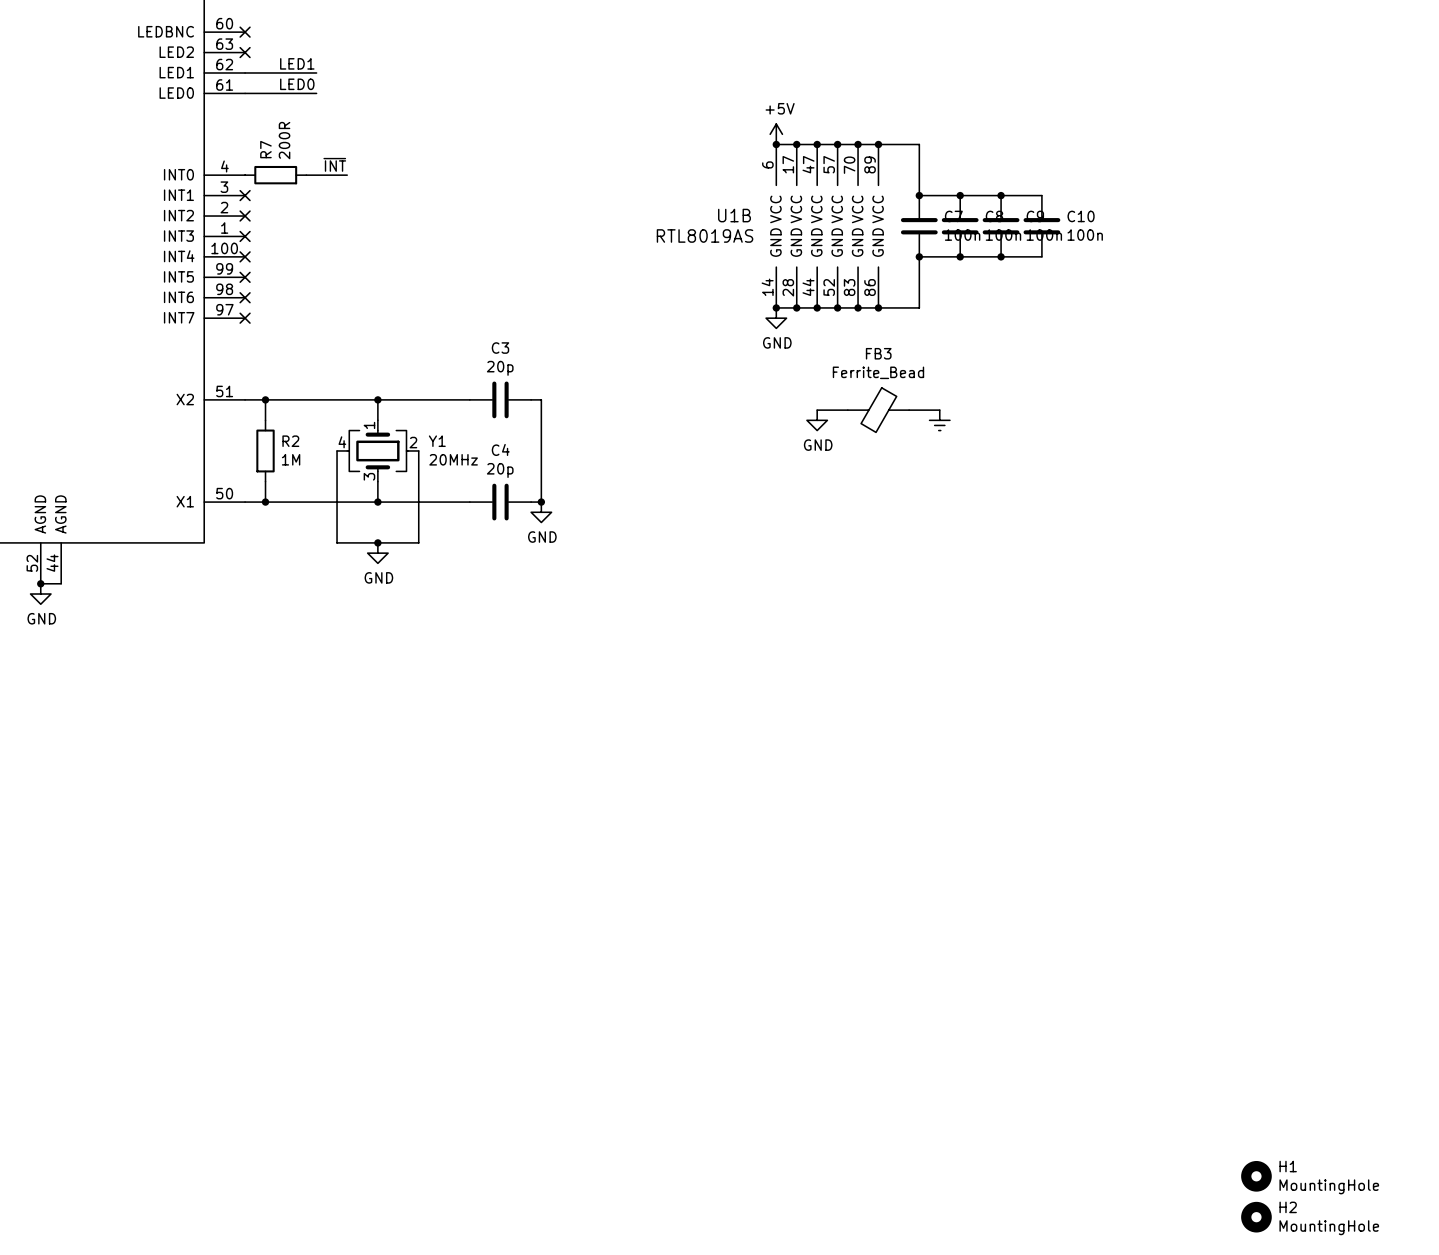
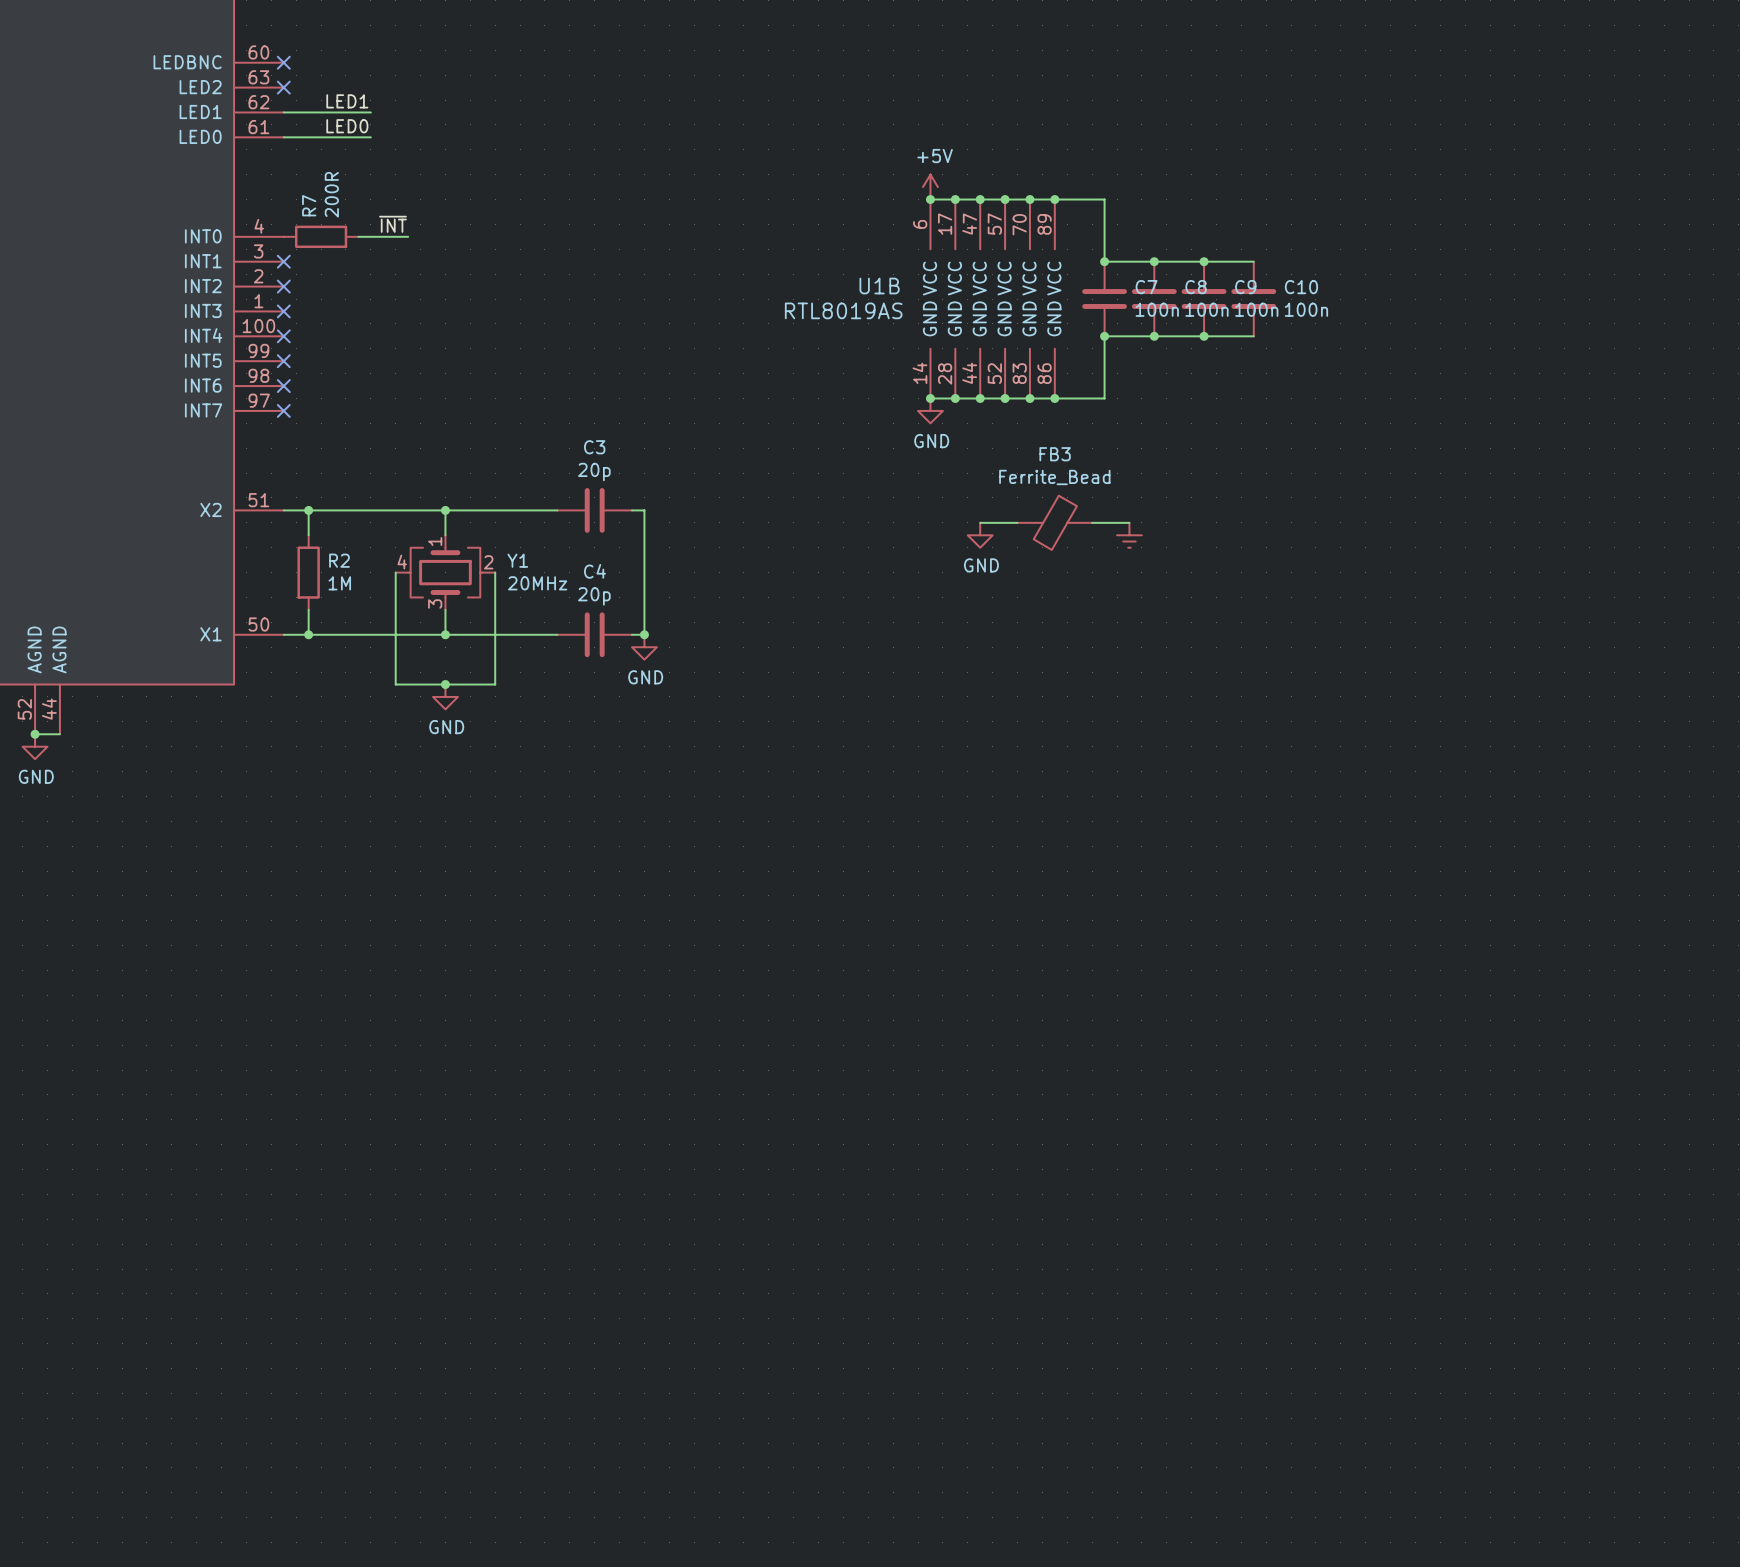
H1: MountingHole (1256, 1176) -> none
H2: MountingHole (1256, 1217) -> none

